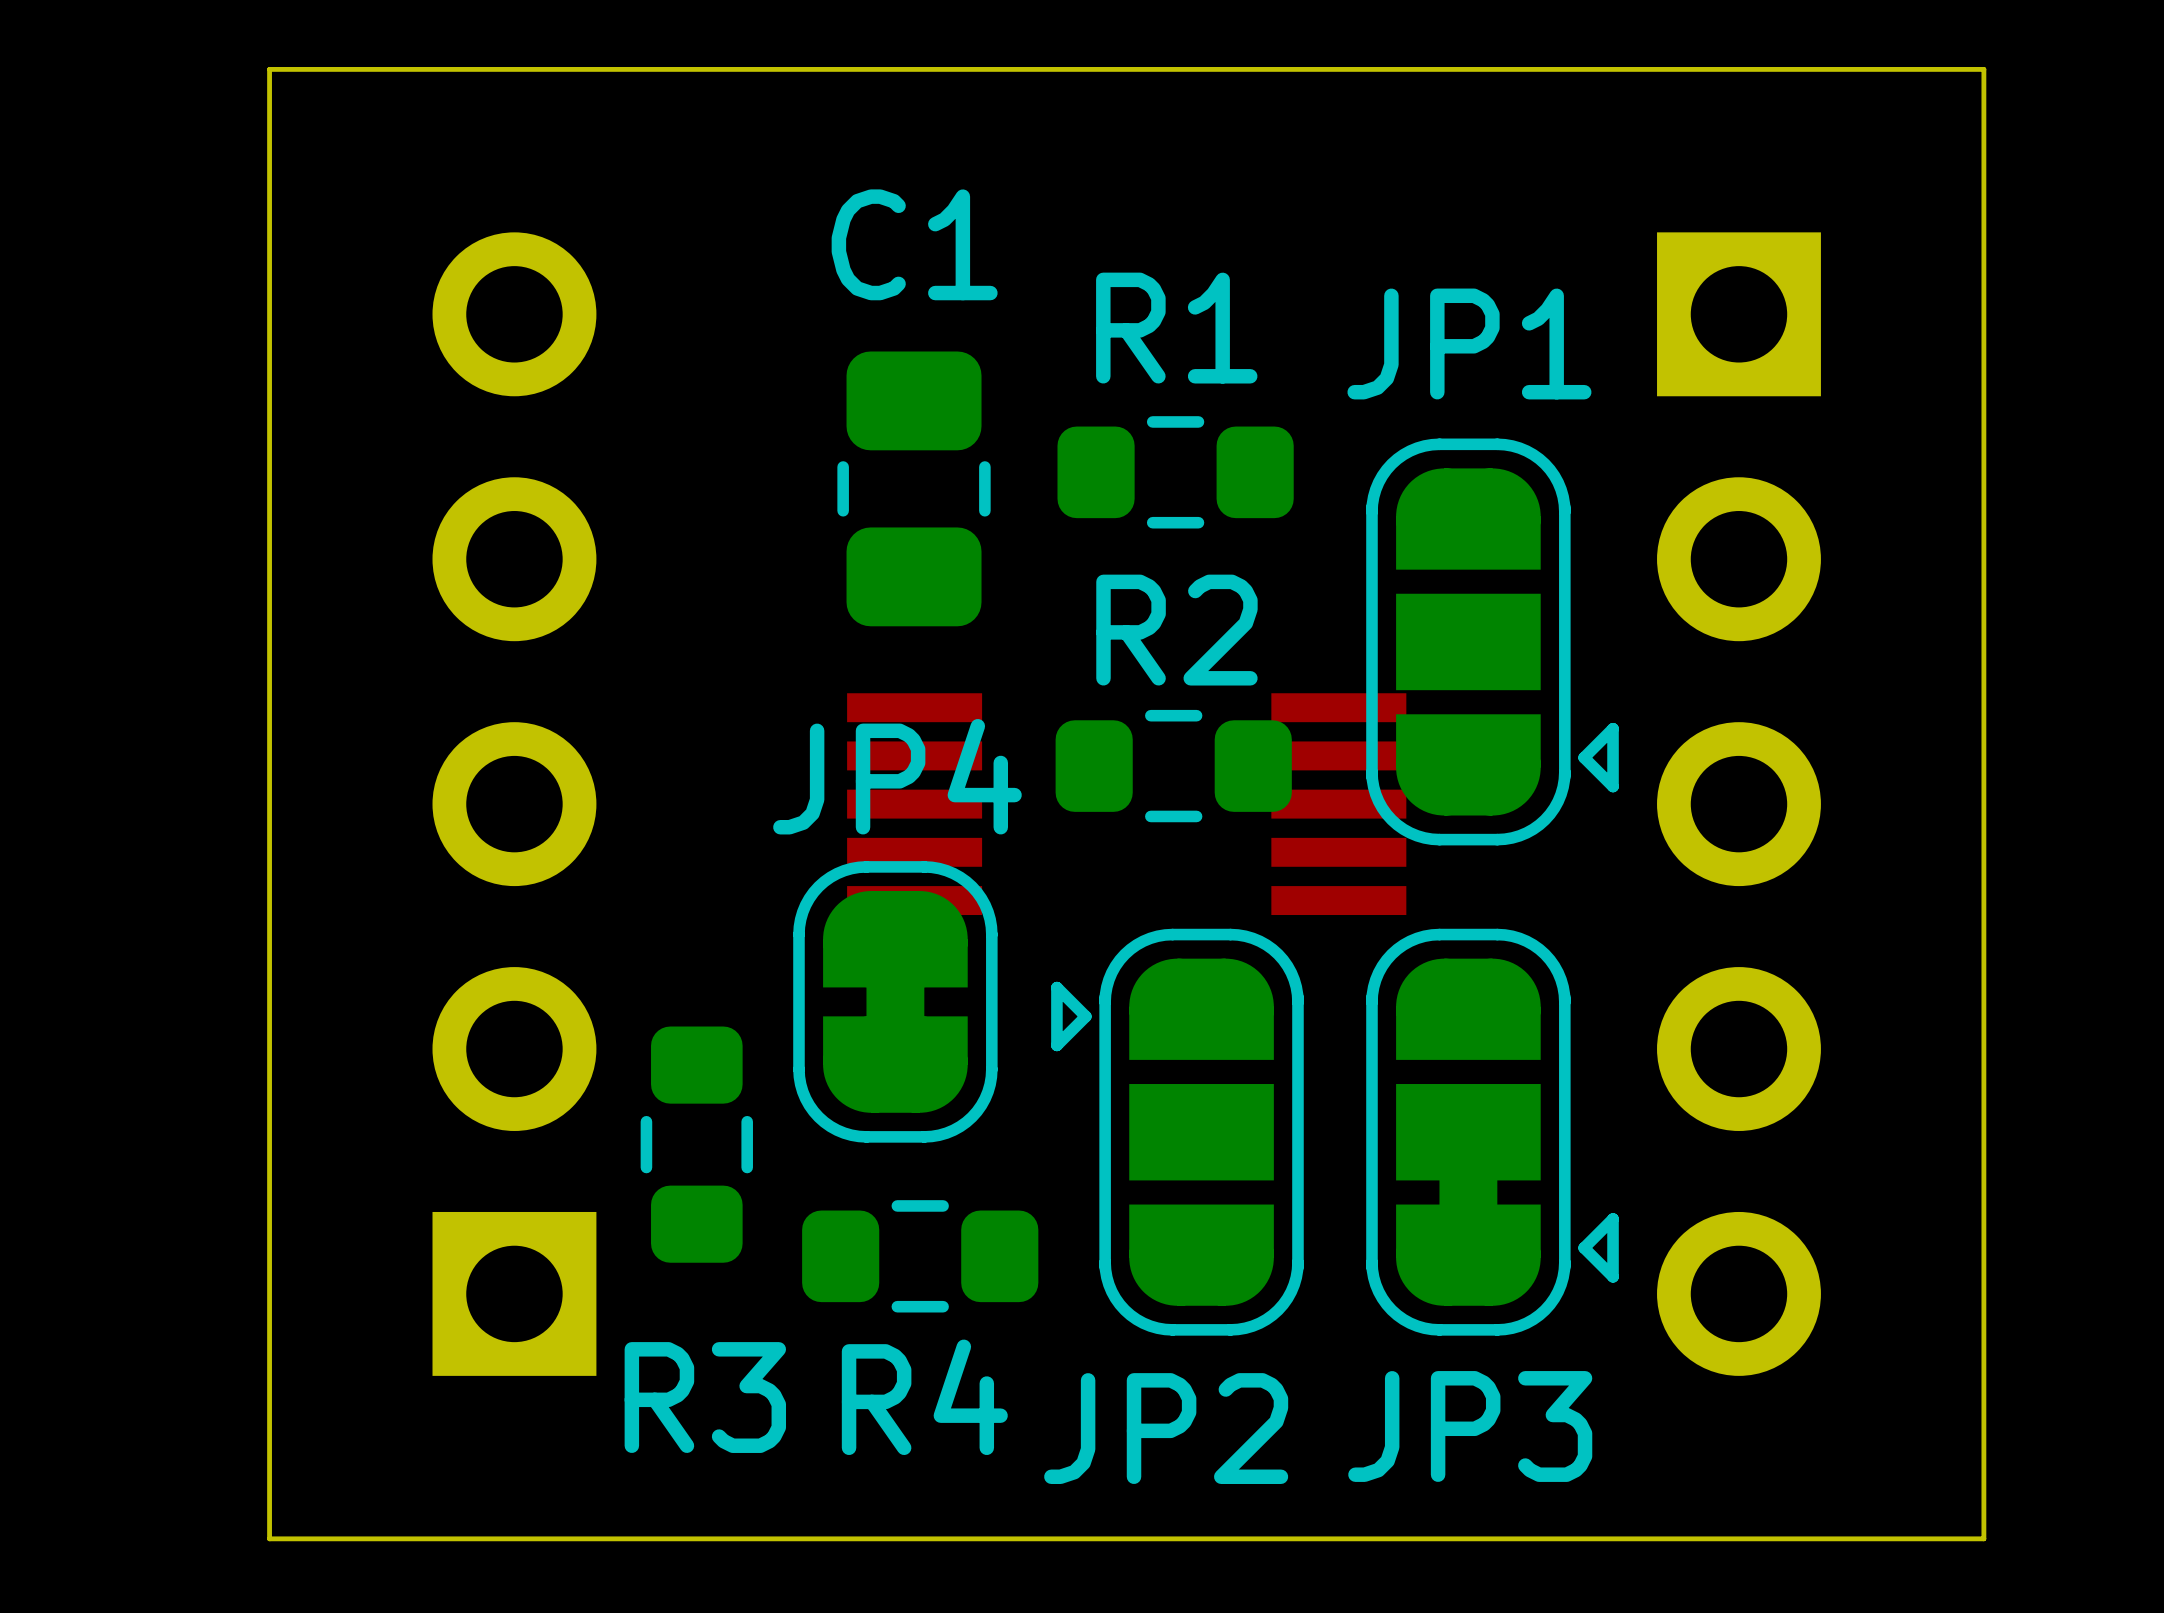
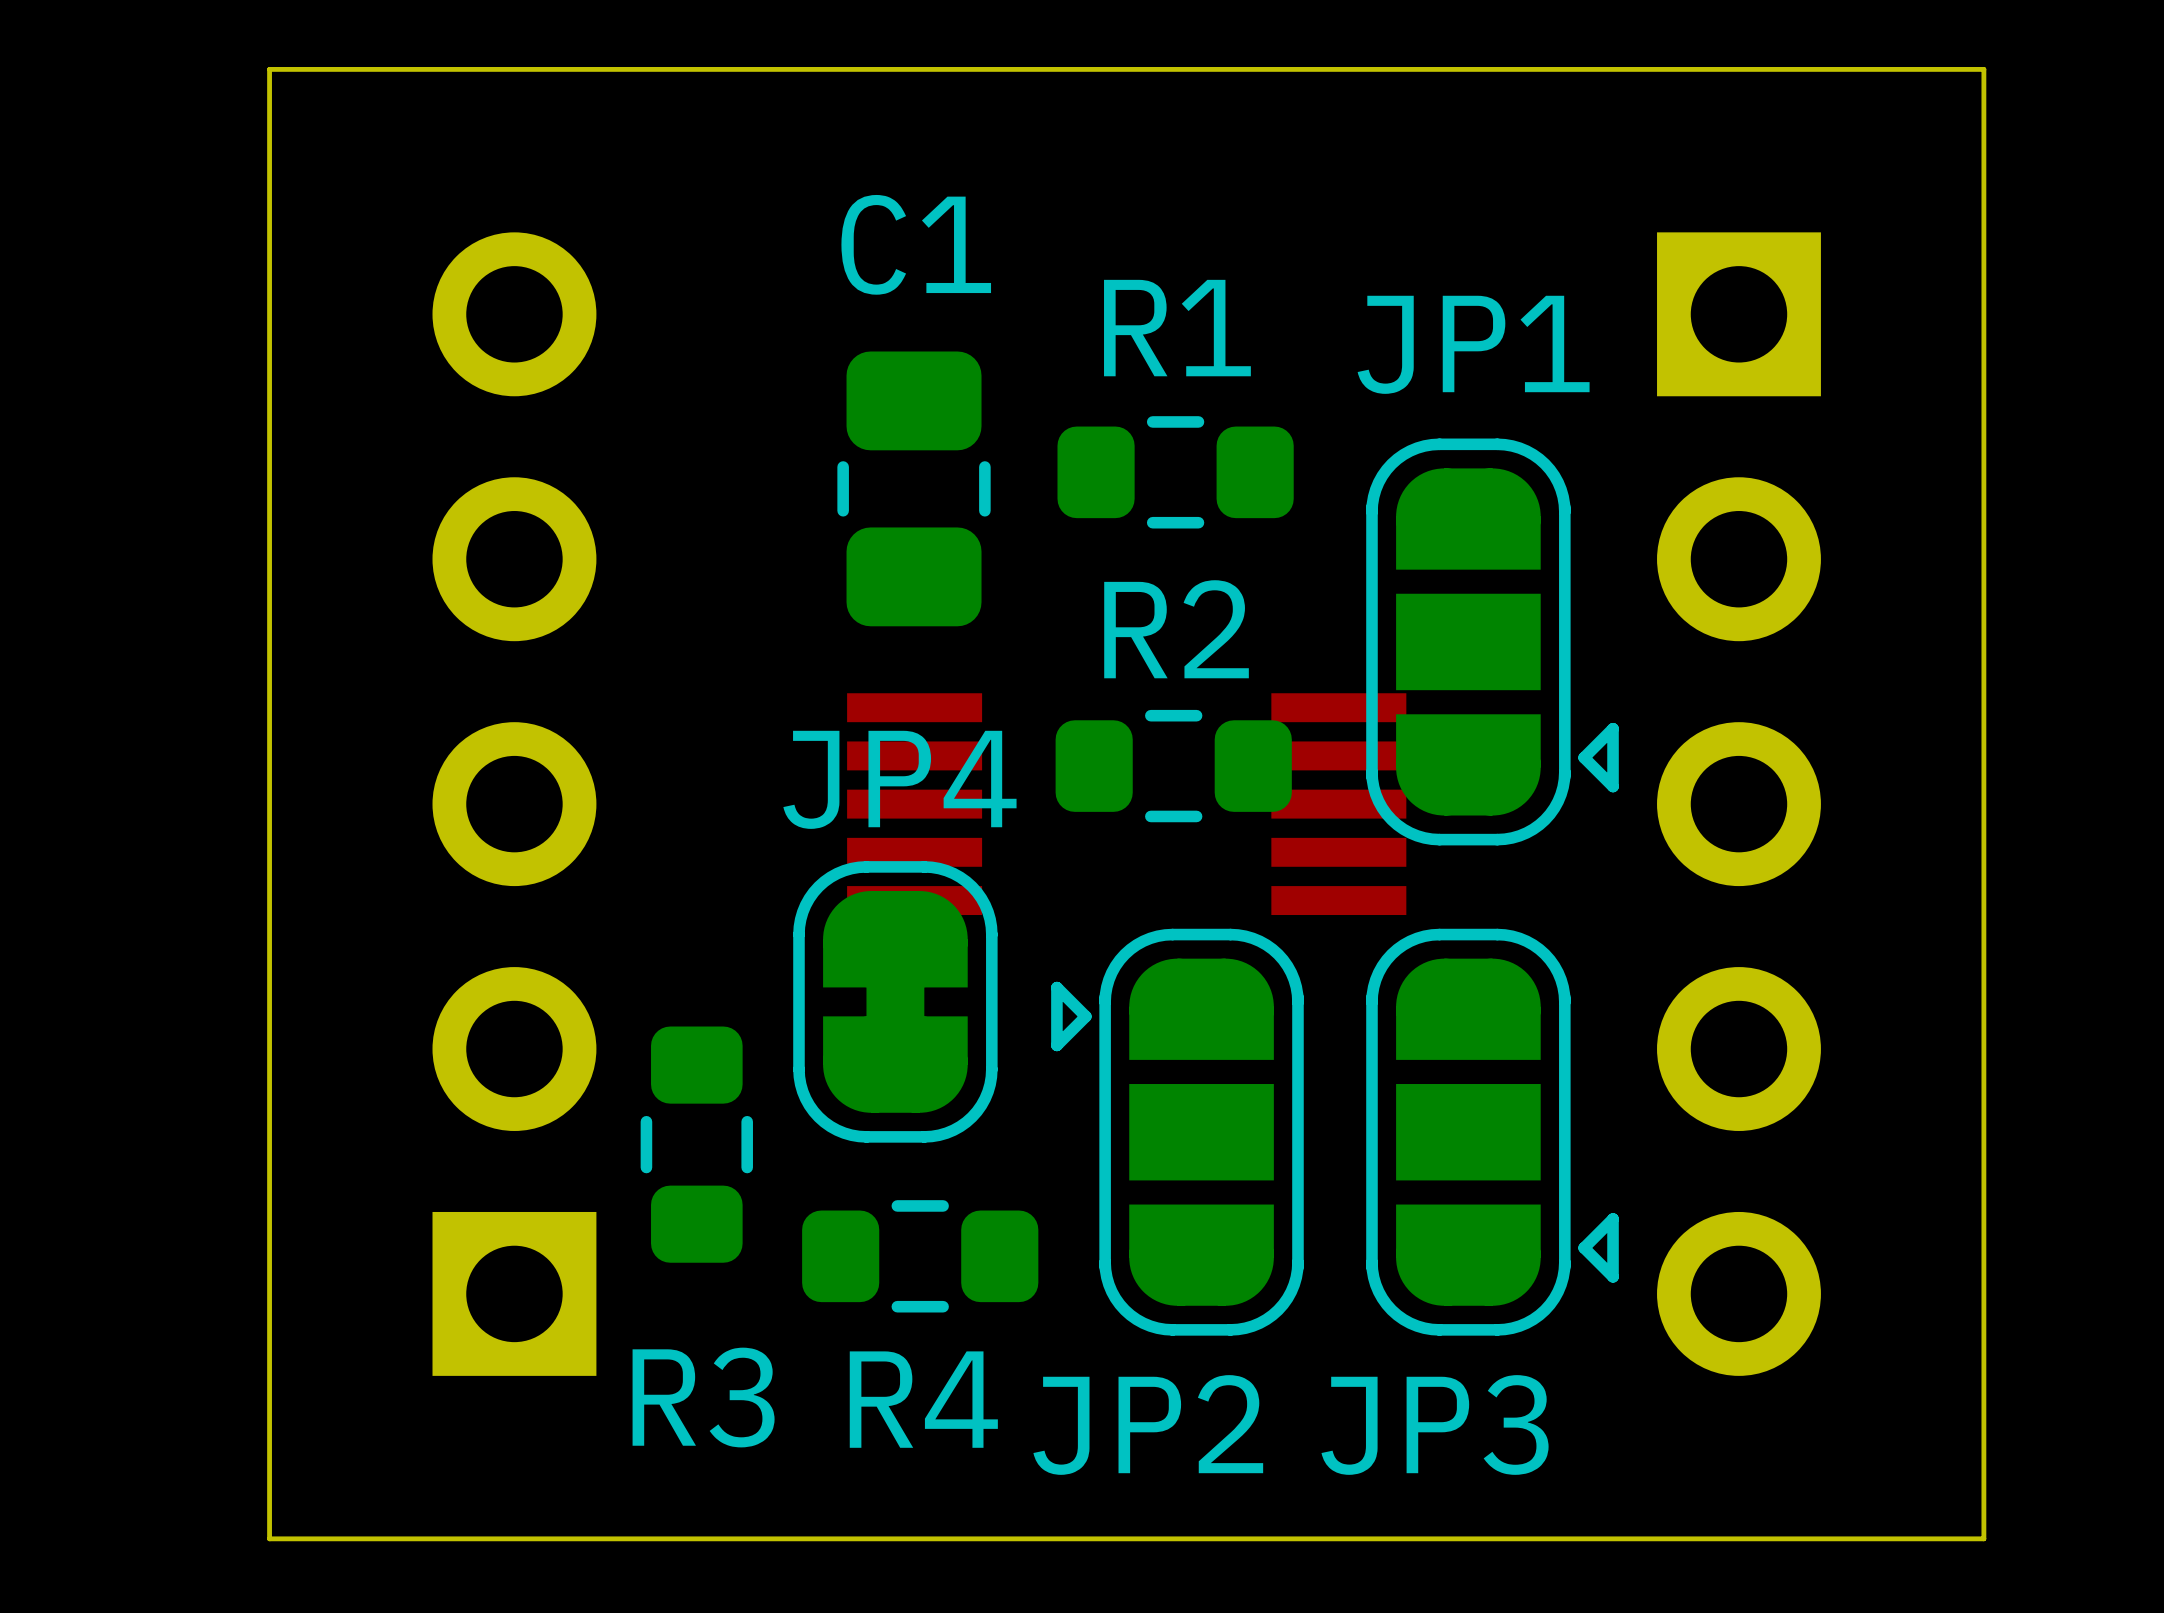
JP3 footprint: [1366, 928, 1619, 1336] -> [1366, 928, 1619, 1336]
JP2 name position: JP2 (1166, 1428) -> JP2 (1148, 1424)

